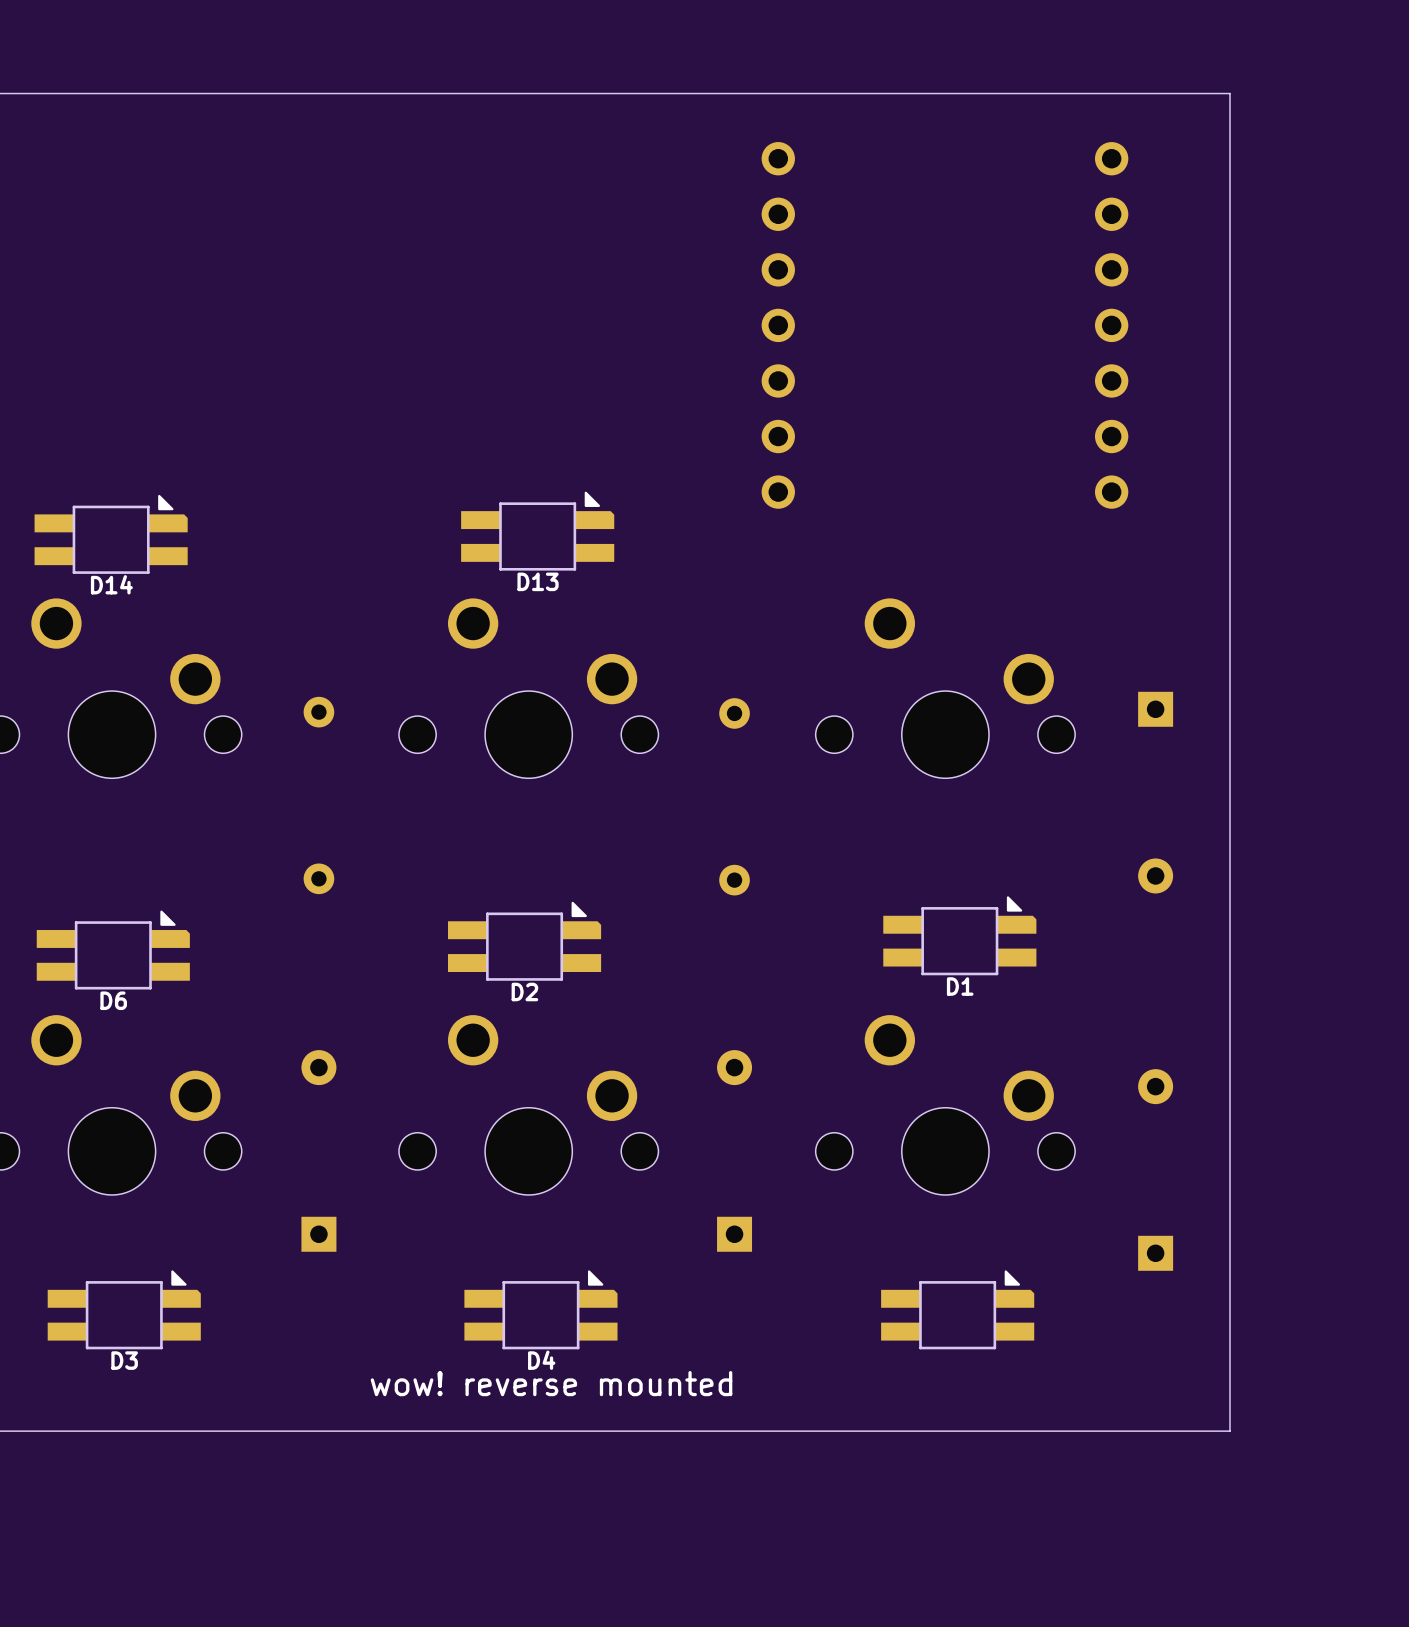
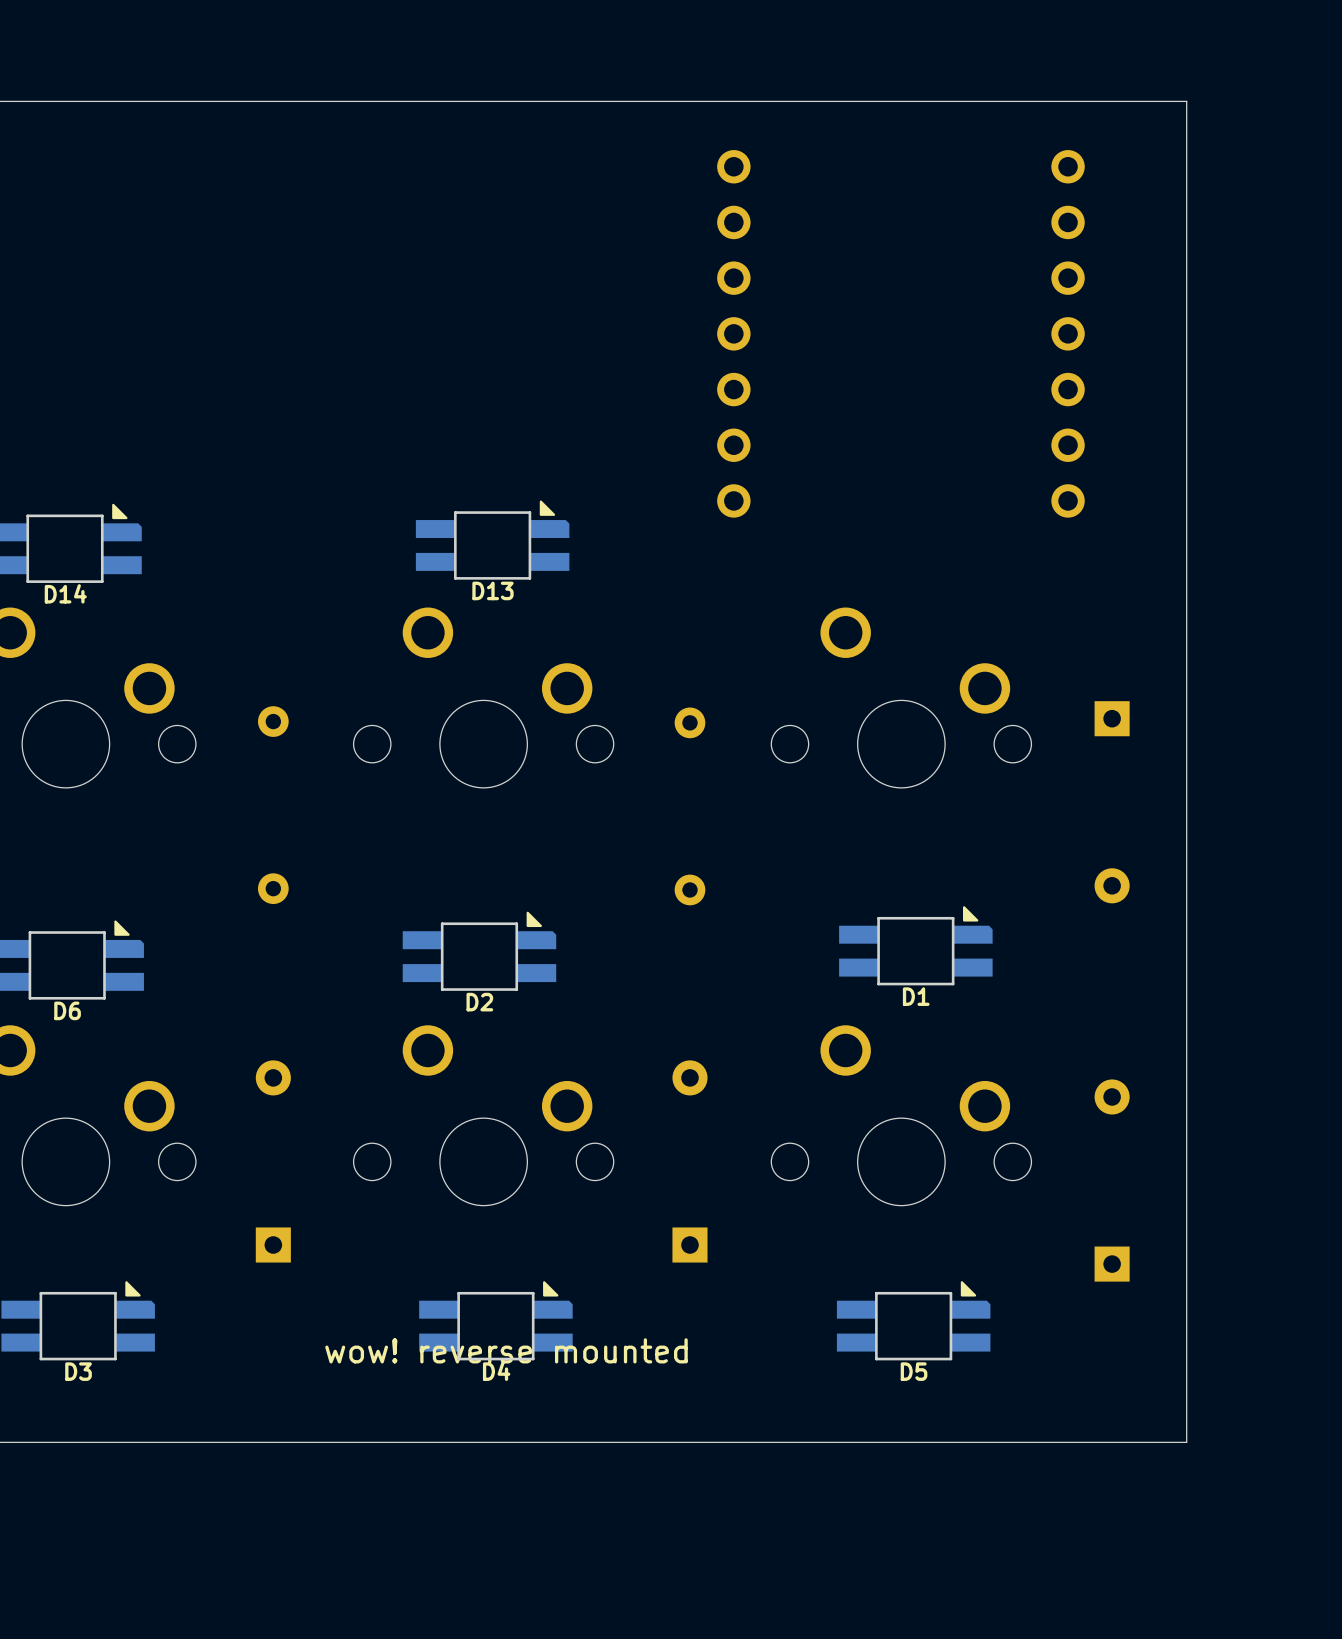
D5 name: none -> D5 (914, 1371)
text position: wow! reverse mounted (551, 1383) -> wow! reverse mounted (506, 1350)

